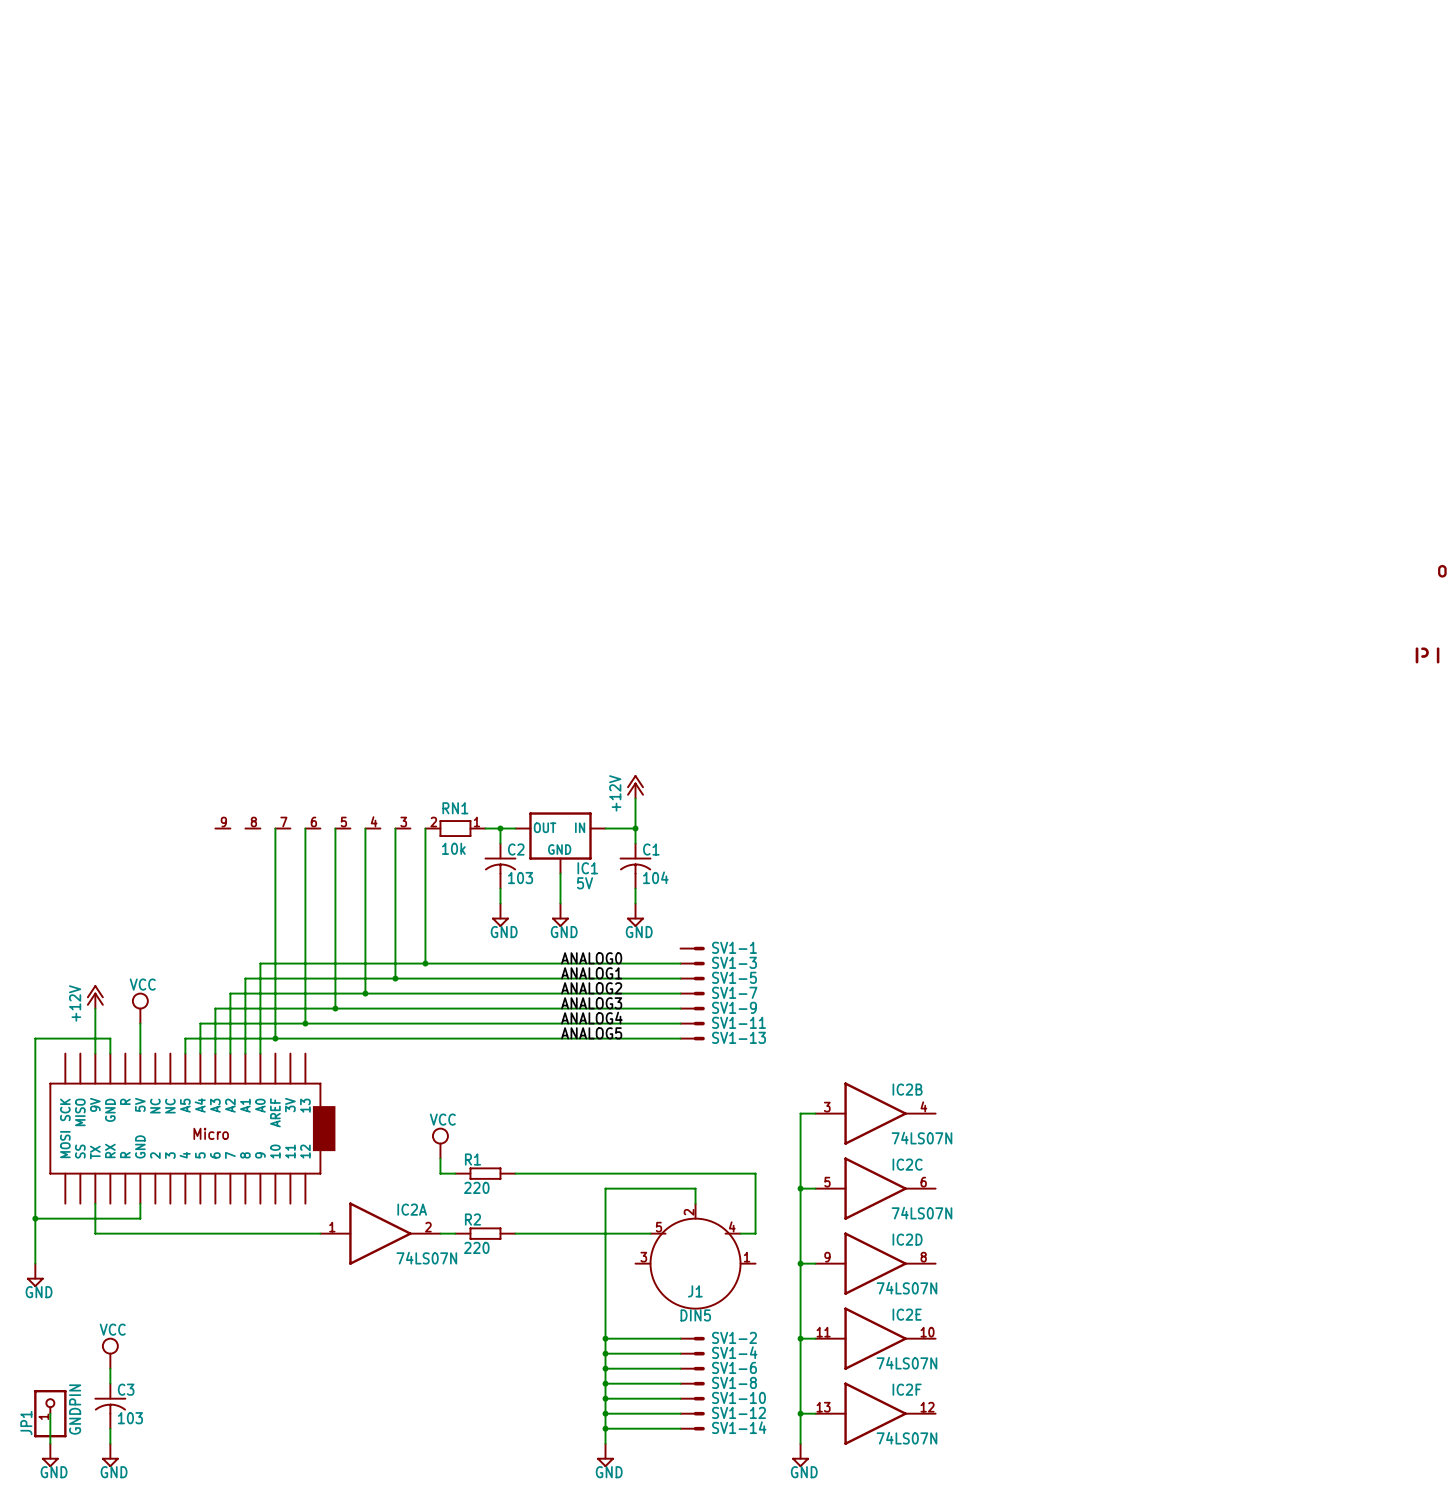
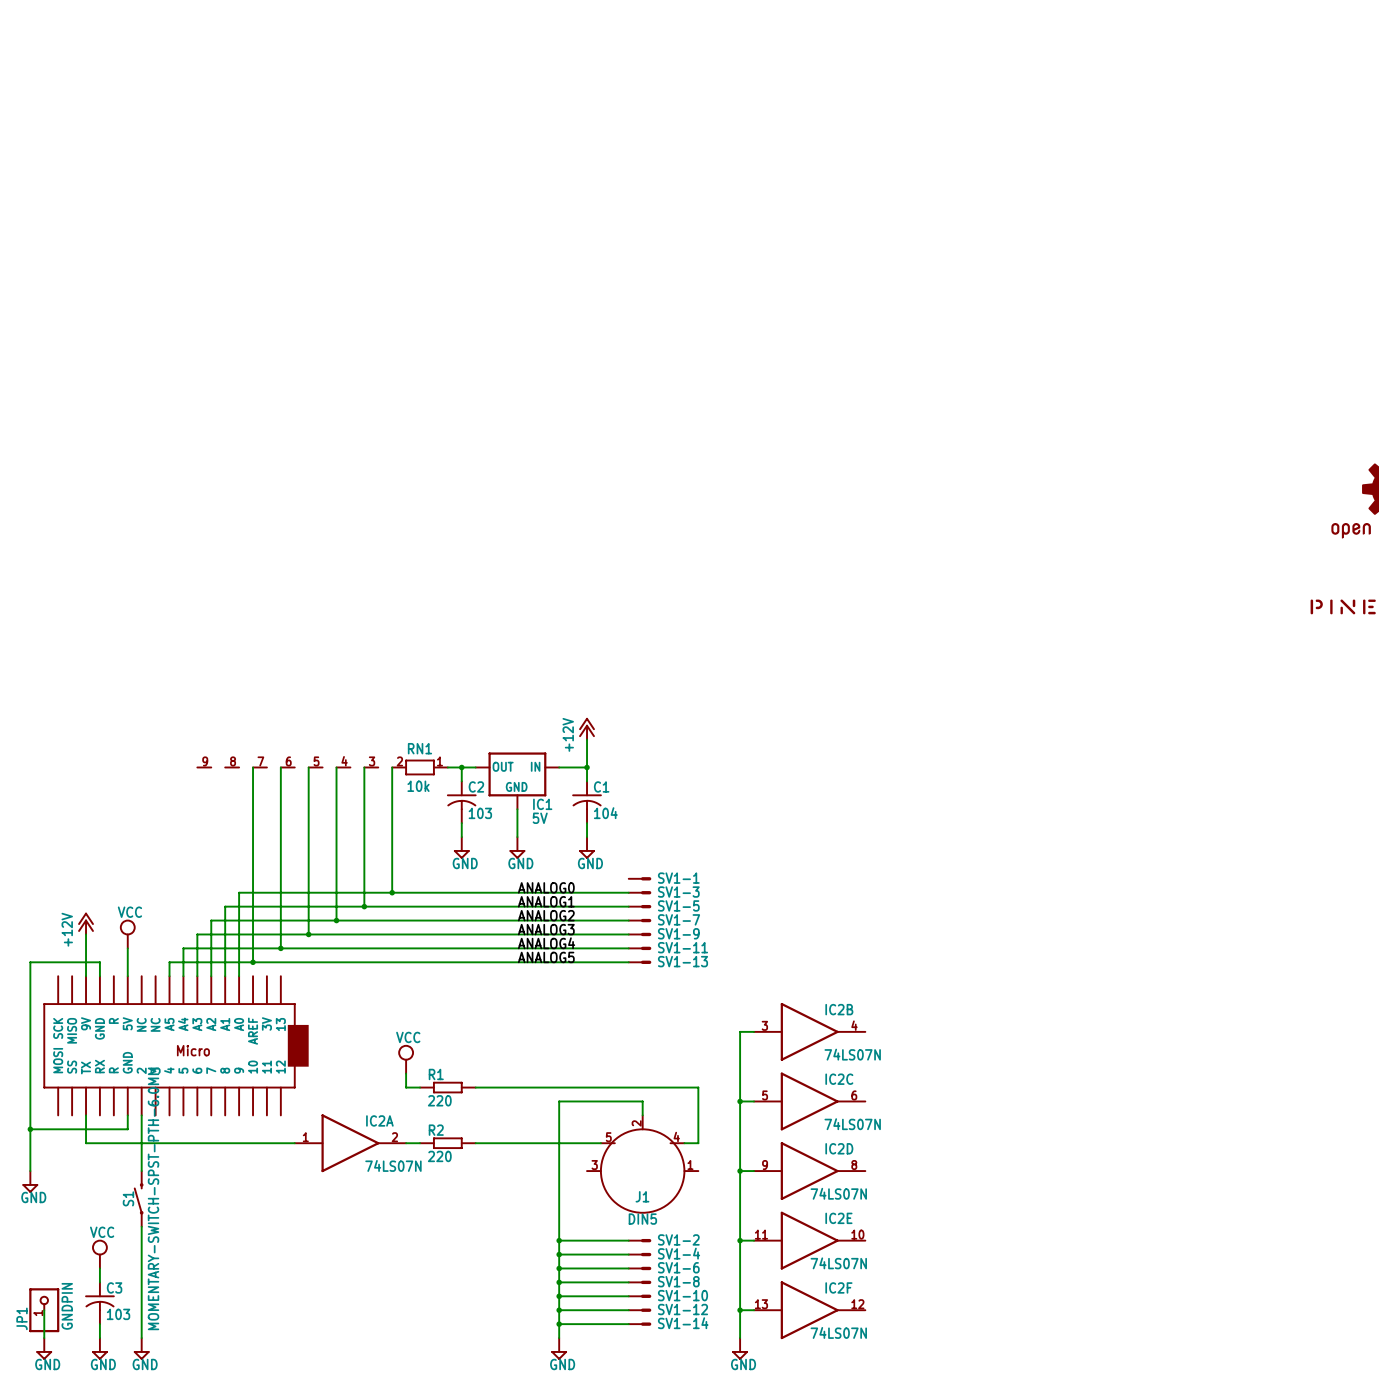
wire: none -> (141, 1115) (141, 1171)
S1: none -> MOMENTARY-SWITCH-SPST-PTH-6.0MM (138, 1198)
wire: none -> (141, 1226) (141, 1338)
power symbol: none -> GND (141, 1348)

